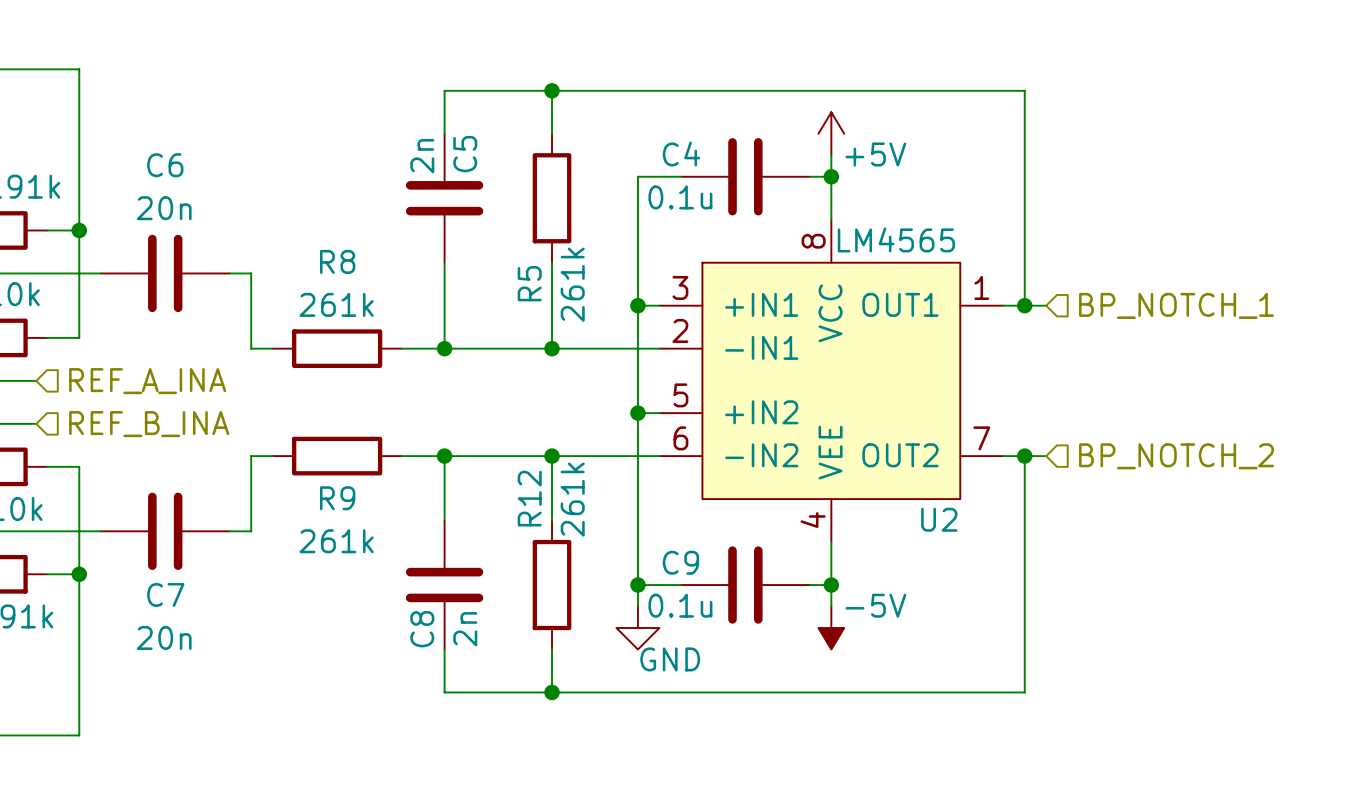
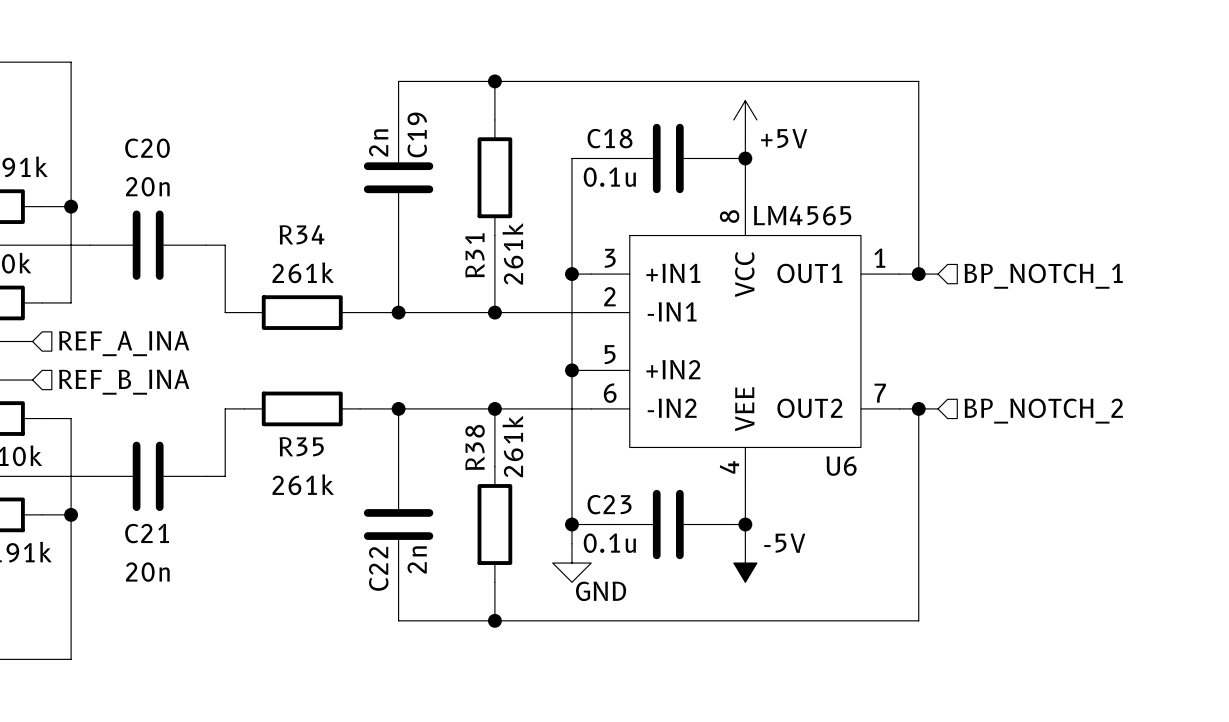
C4 name: C4 (681, 153) -> C18 (610, 138)
C5 name: C5 (465, 154) -> C19 (417, 134)
C6 name: C6 (165, 165) -> C20 (147, 148)
R8 name: R8 (337, 261) -> R34 (301, 234)
R5 name: R5 (529, 283) -> R31 (474, 255)
R9 name: R9 (337, 498) -> R35 (301, 446)
R12 name: R12 (529, 498) -> R38 (475, 447)
U2 name: U2 (939, 519) -> U6 (841, 466)
C9 name: C9 (680, 562) -> C23 (609, 504)
C7 name: C7 (165, 594) -> C21 (147, 533)
C8 name: C8 (422, 629) -> C22 (378, 568)

